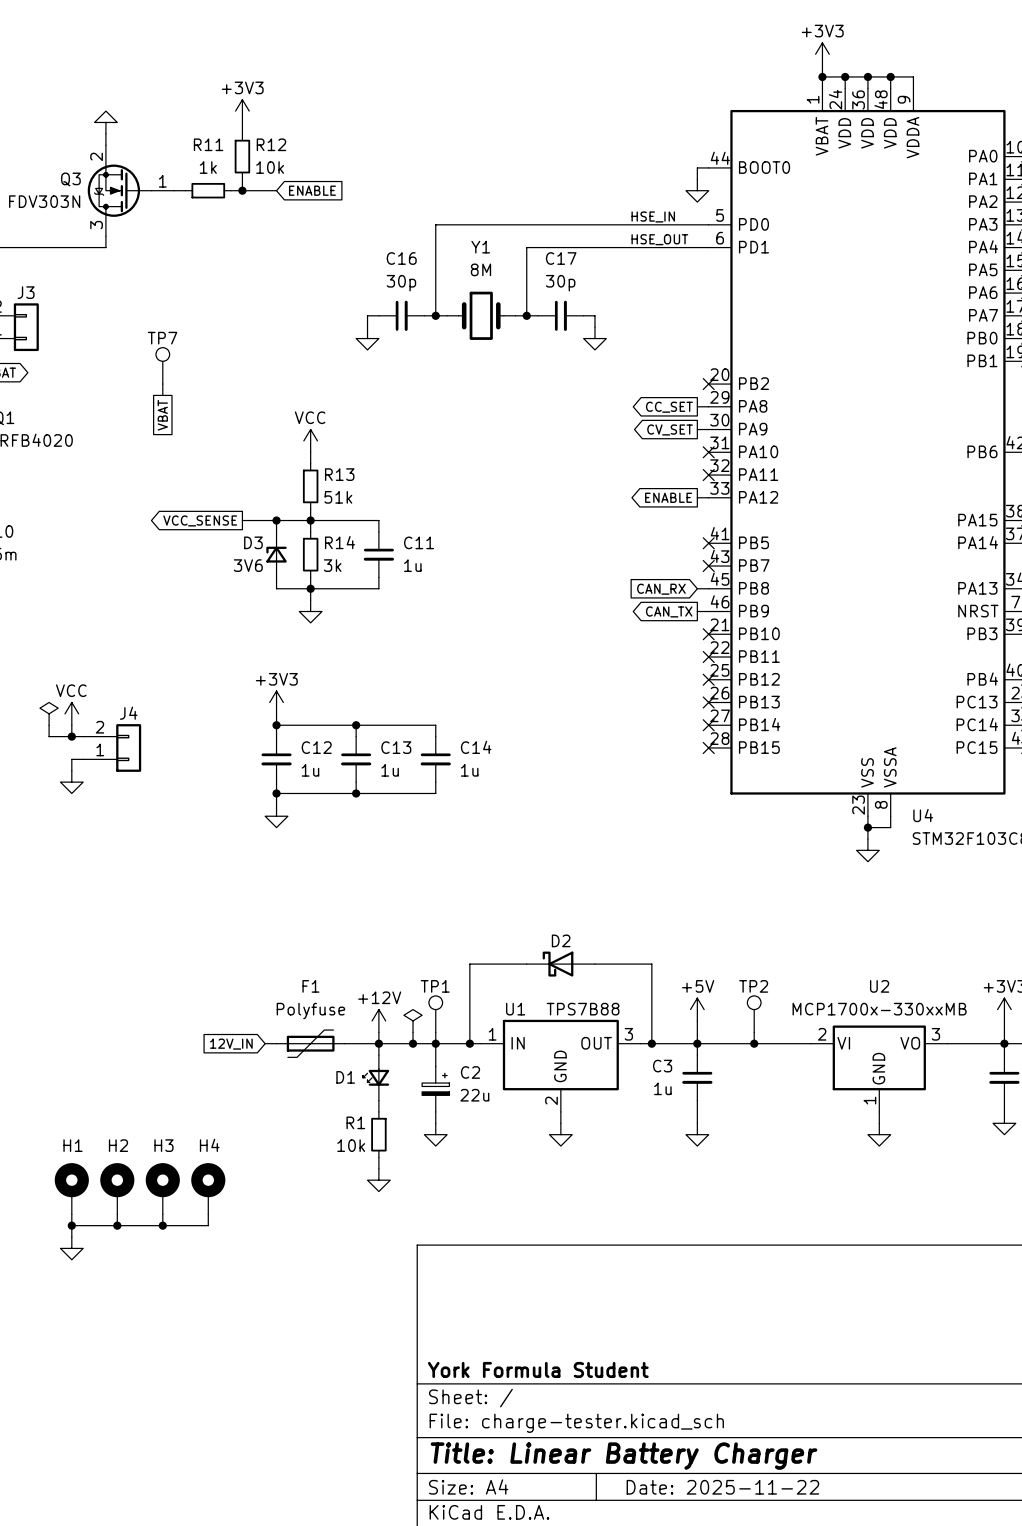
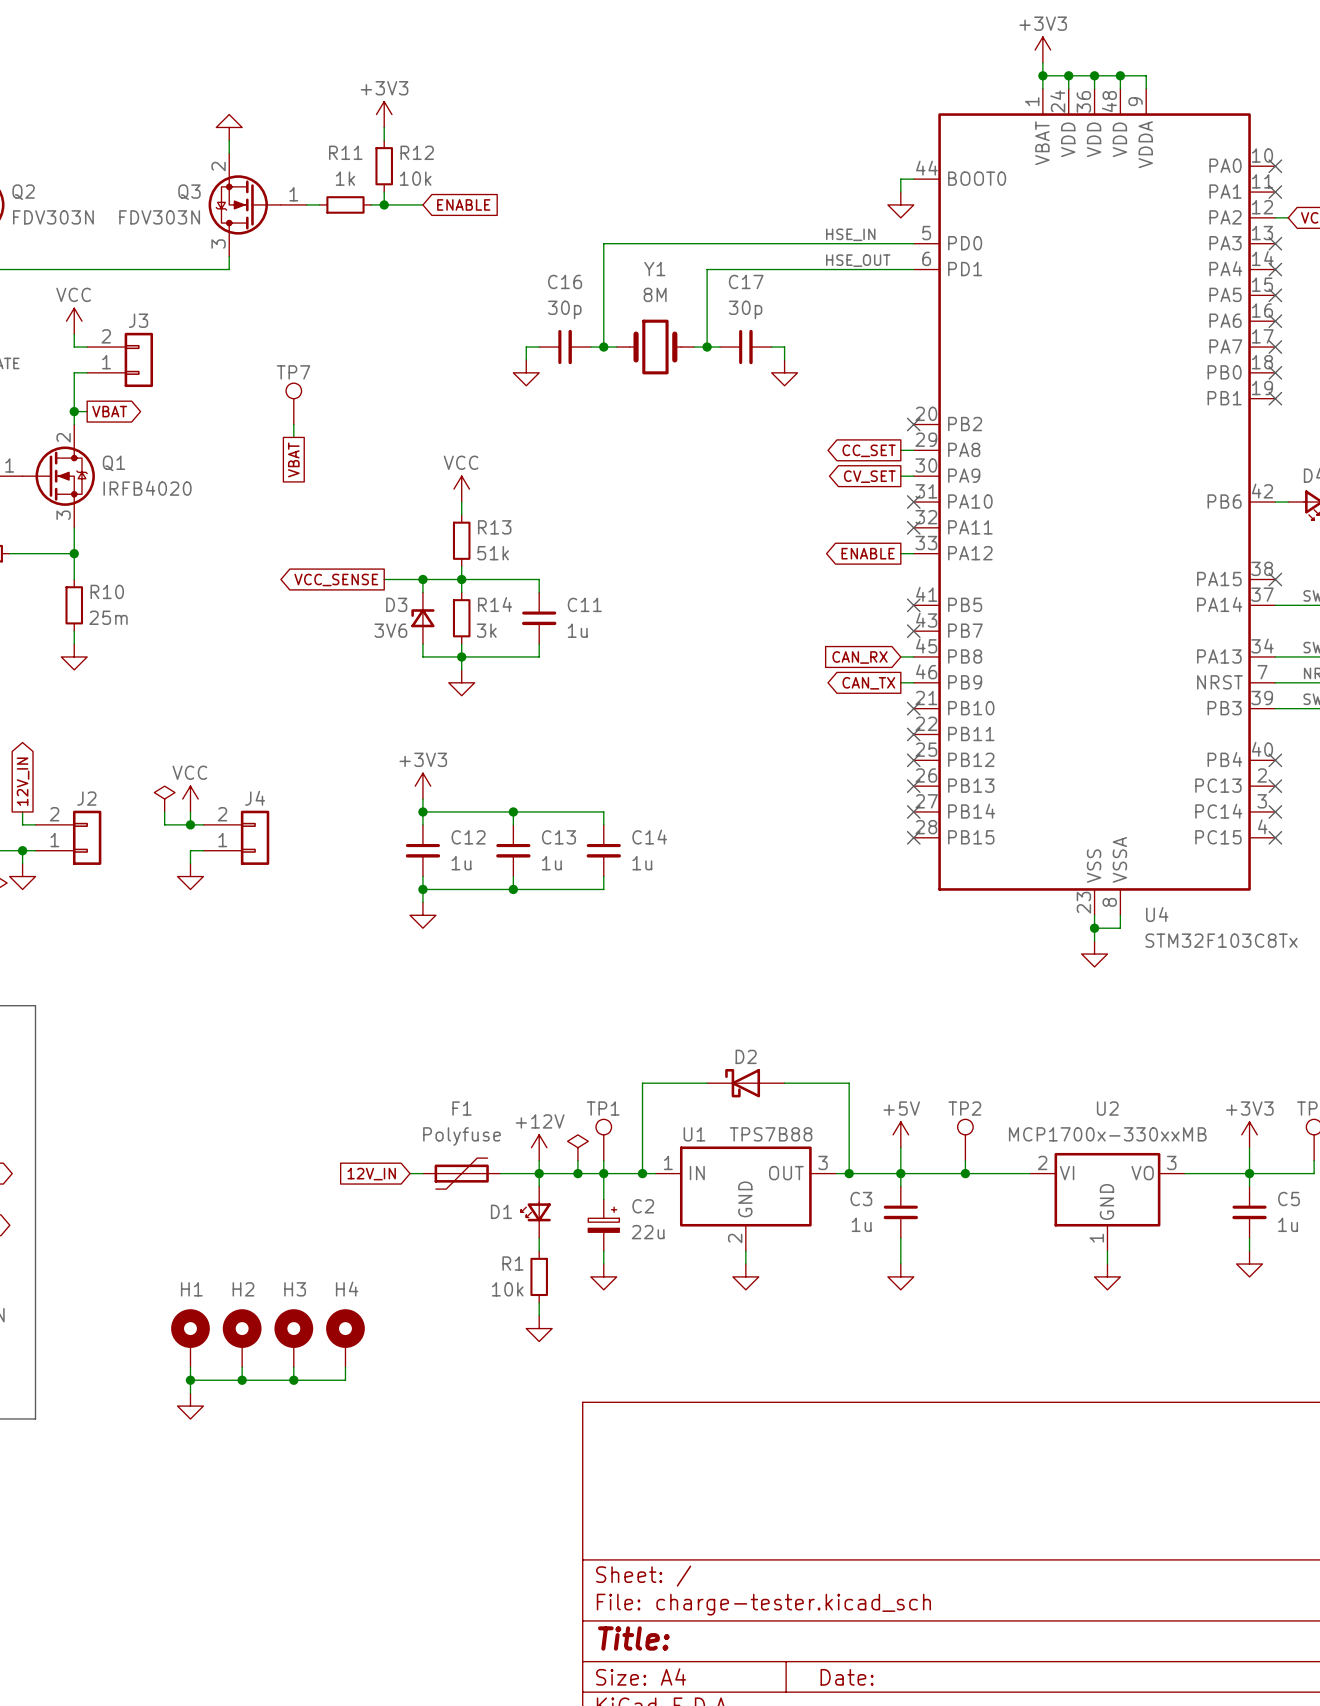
title block: York Formula Student (538, 1369) -> none
title block: Title: Linear Battery Charger (624, 1456) -> Title: (633, 1638)
title block: Date: 2025-11-22 (722, 1487) -> Date: (847, 1677)

